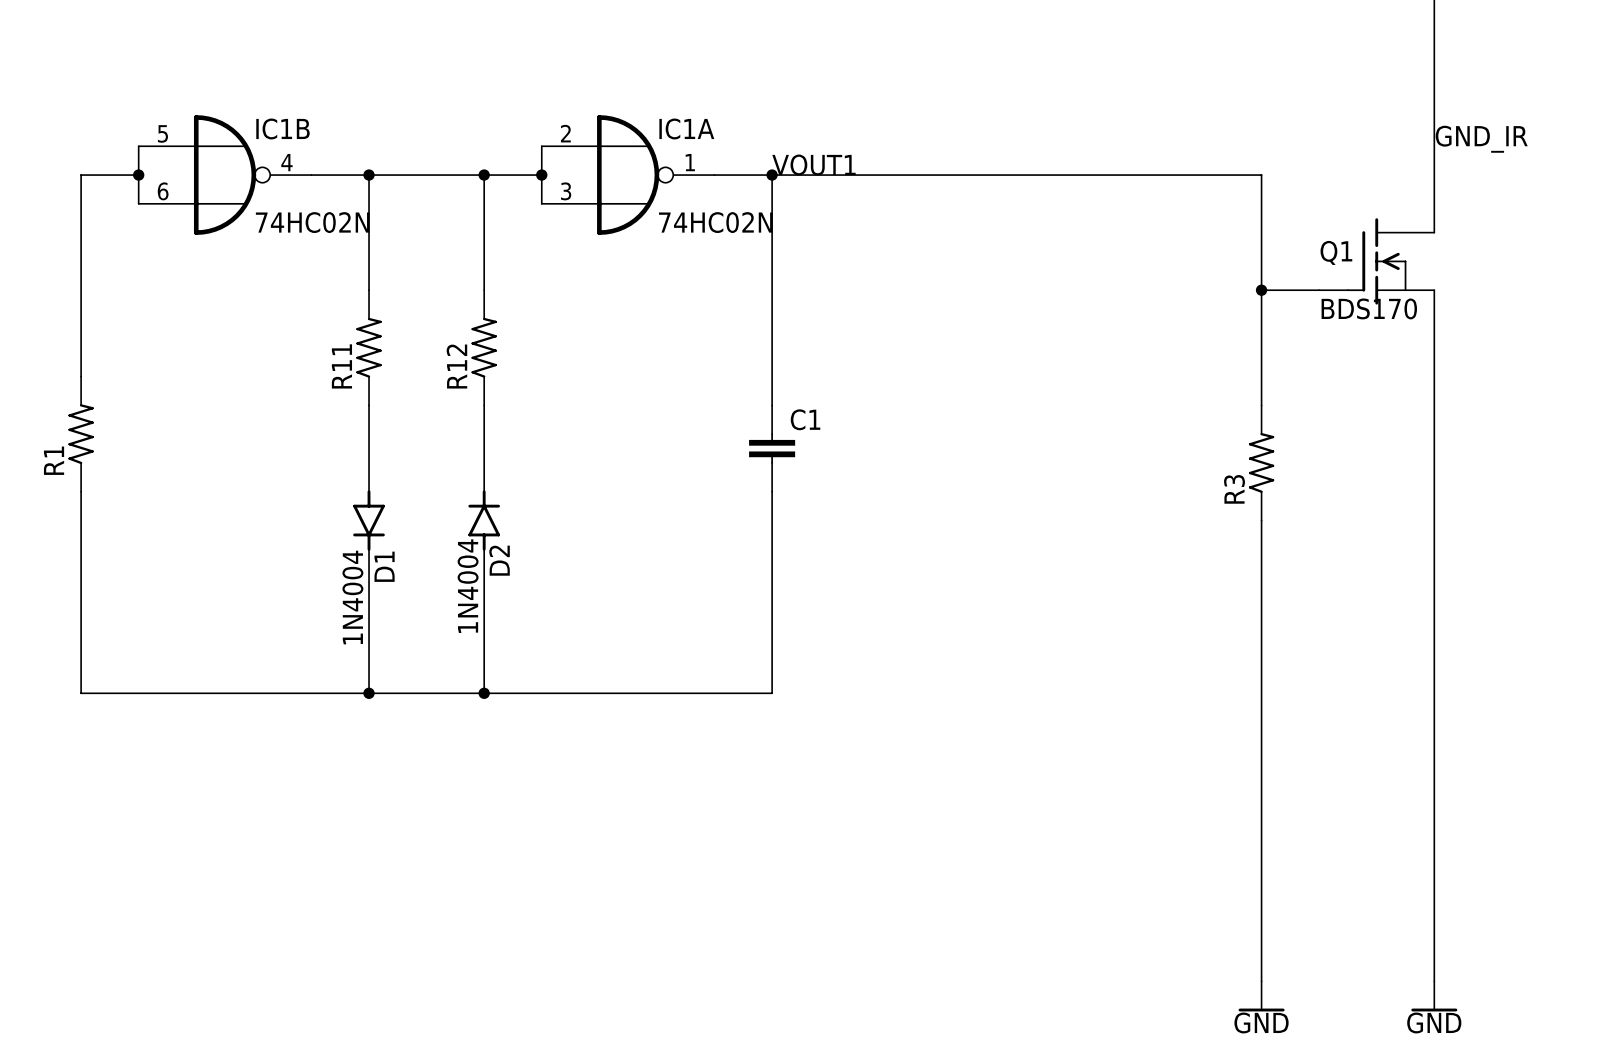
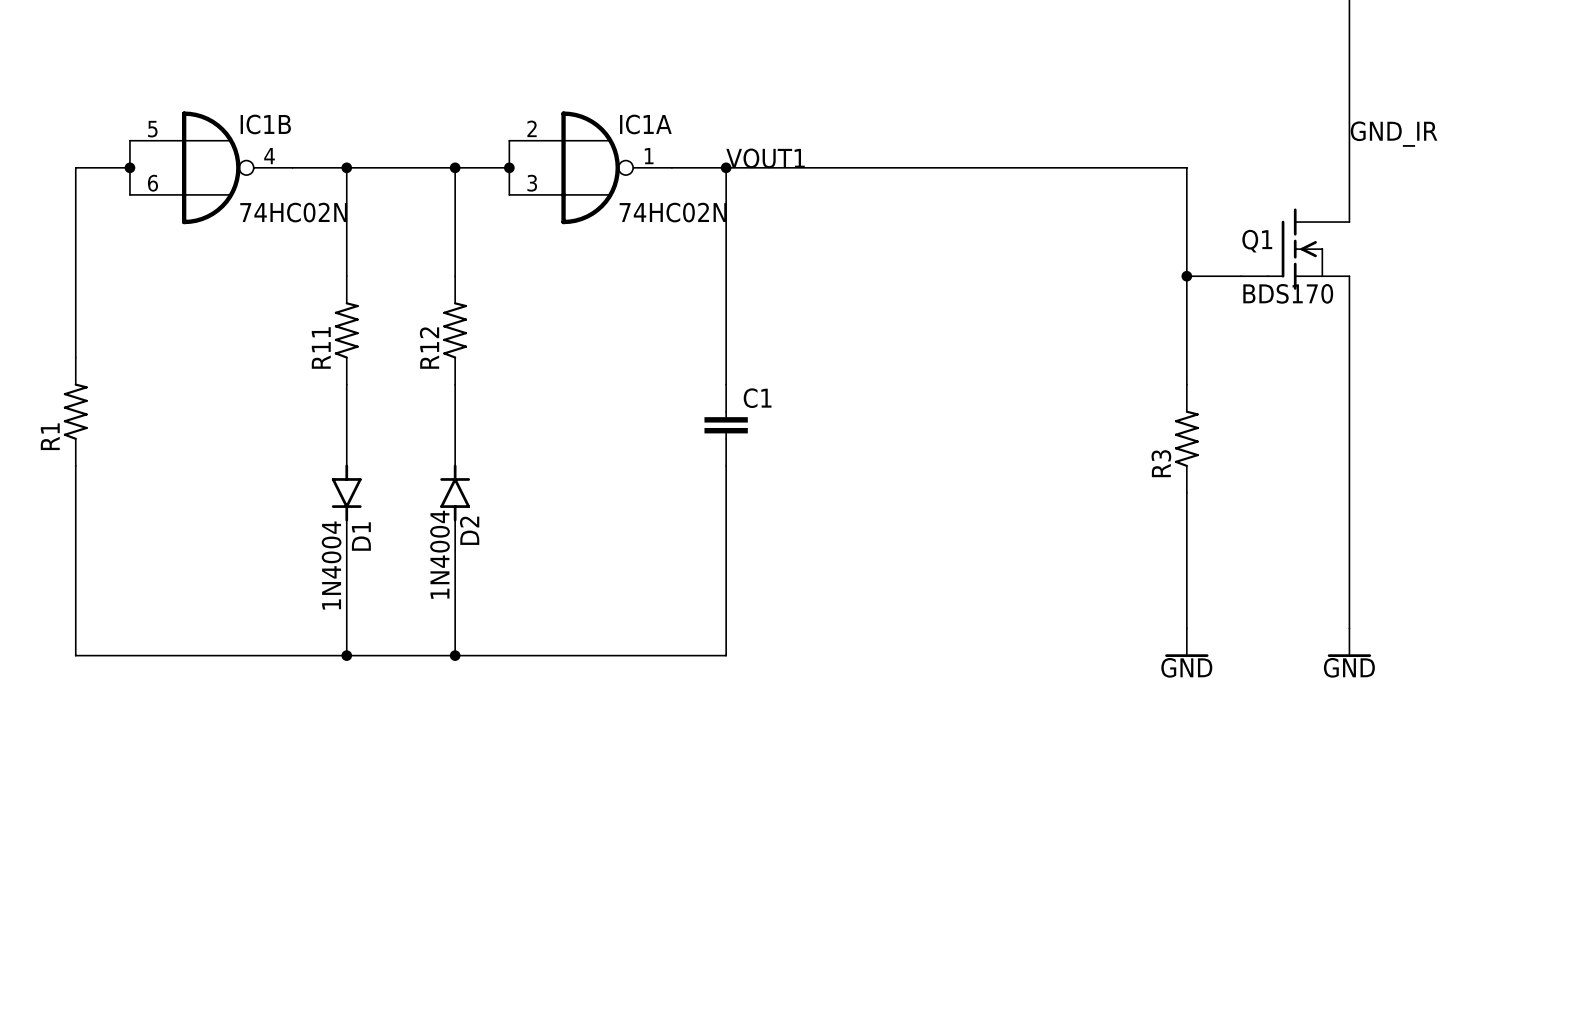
wire: (1261, 664) (1261, 981) -> none
wire: (1434, 664) (1434, 981) -> none
power symbol: none -> GND (1186, 642)
power symbol: none -> GND (1349, 642)
power symbol: GND (1261, 996) -> none
power symbol: GND (1434, 996) -> none

